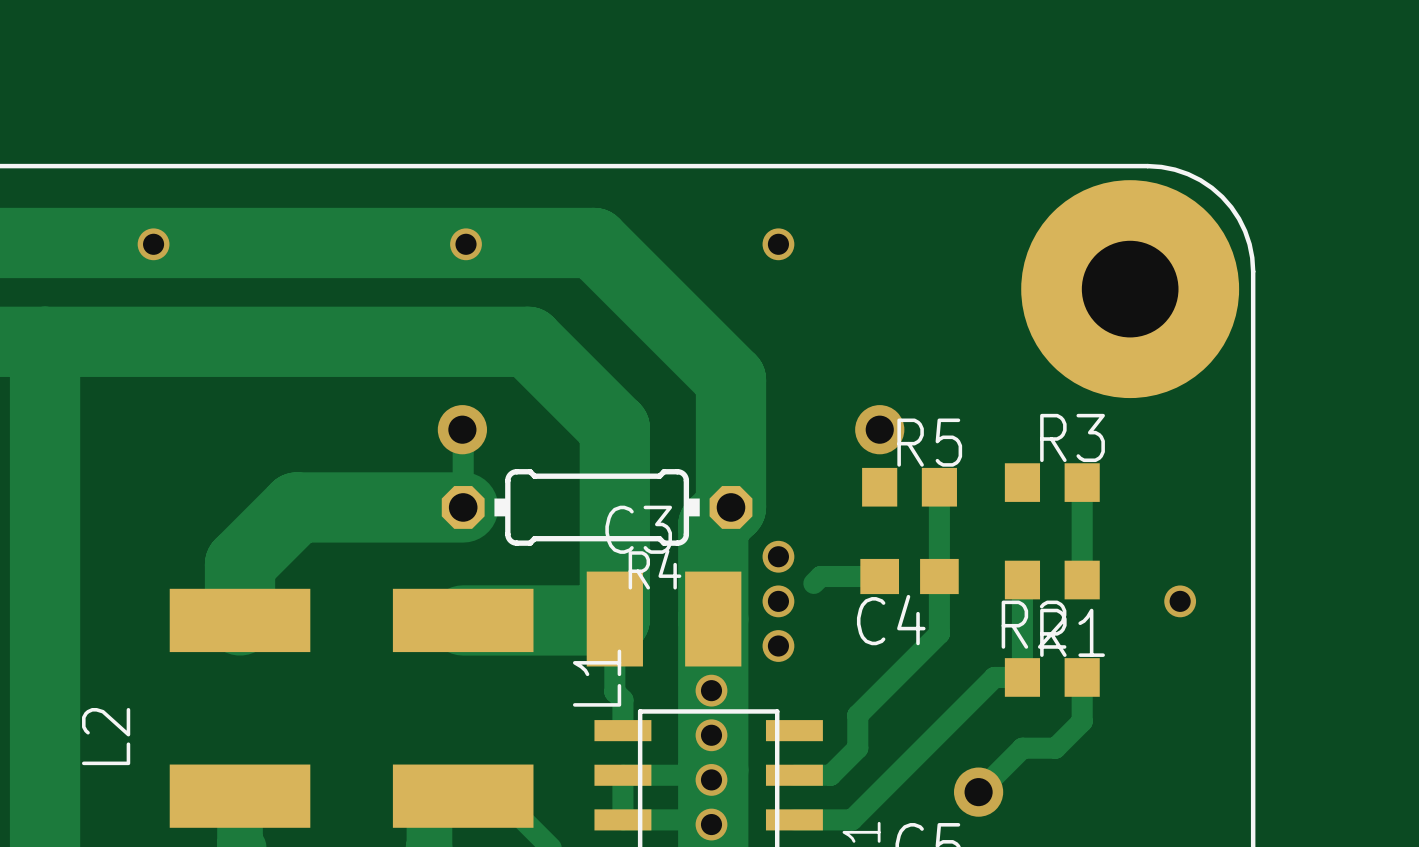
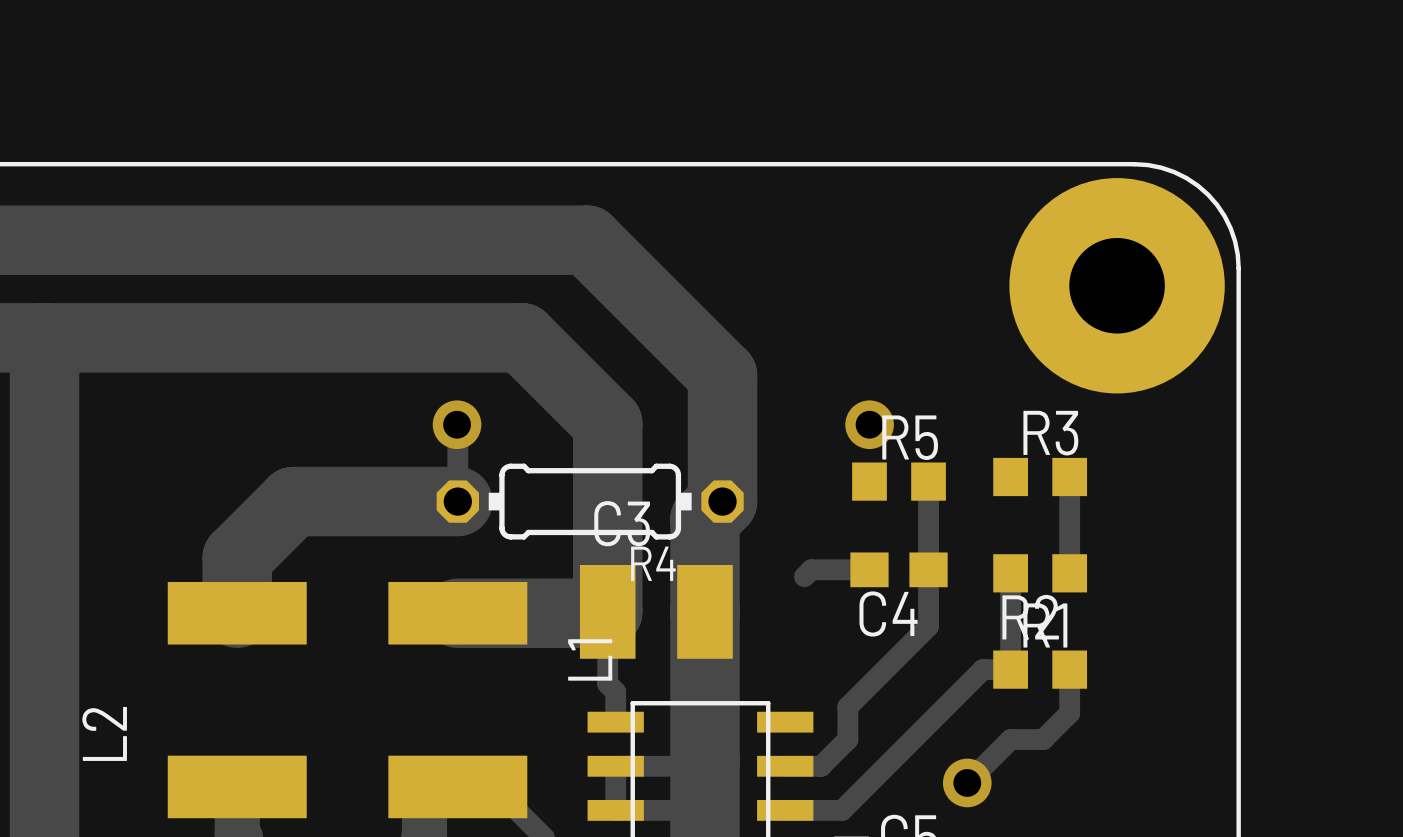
via: (153, 244) -> none
via: (466, 244) -> none
via: (778, 244) -> none
via: (778, 556) -> none
via: (778, 601) -> none
via: (1180, 601) -> none
via: (778, 646) -> none
via: (711, 690) -> none
via: (711, 735) -> none
via: (711, 779) -> none
via: (711, 824) -> none

